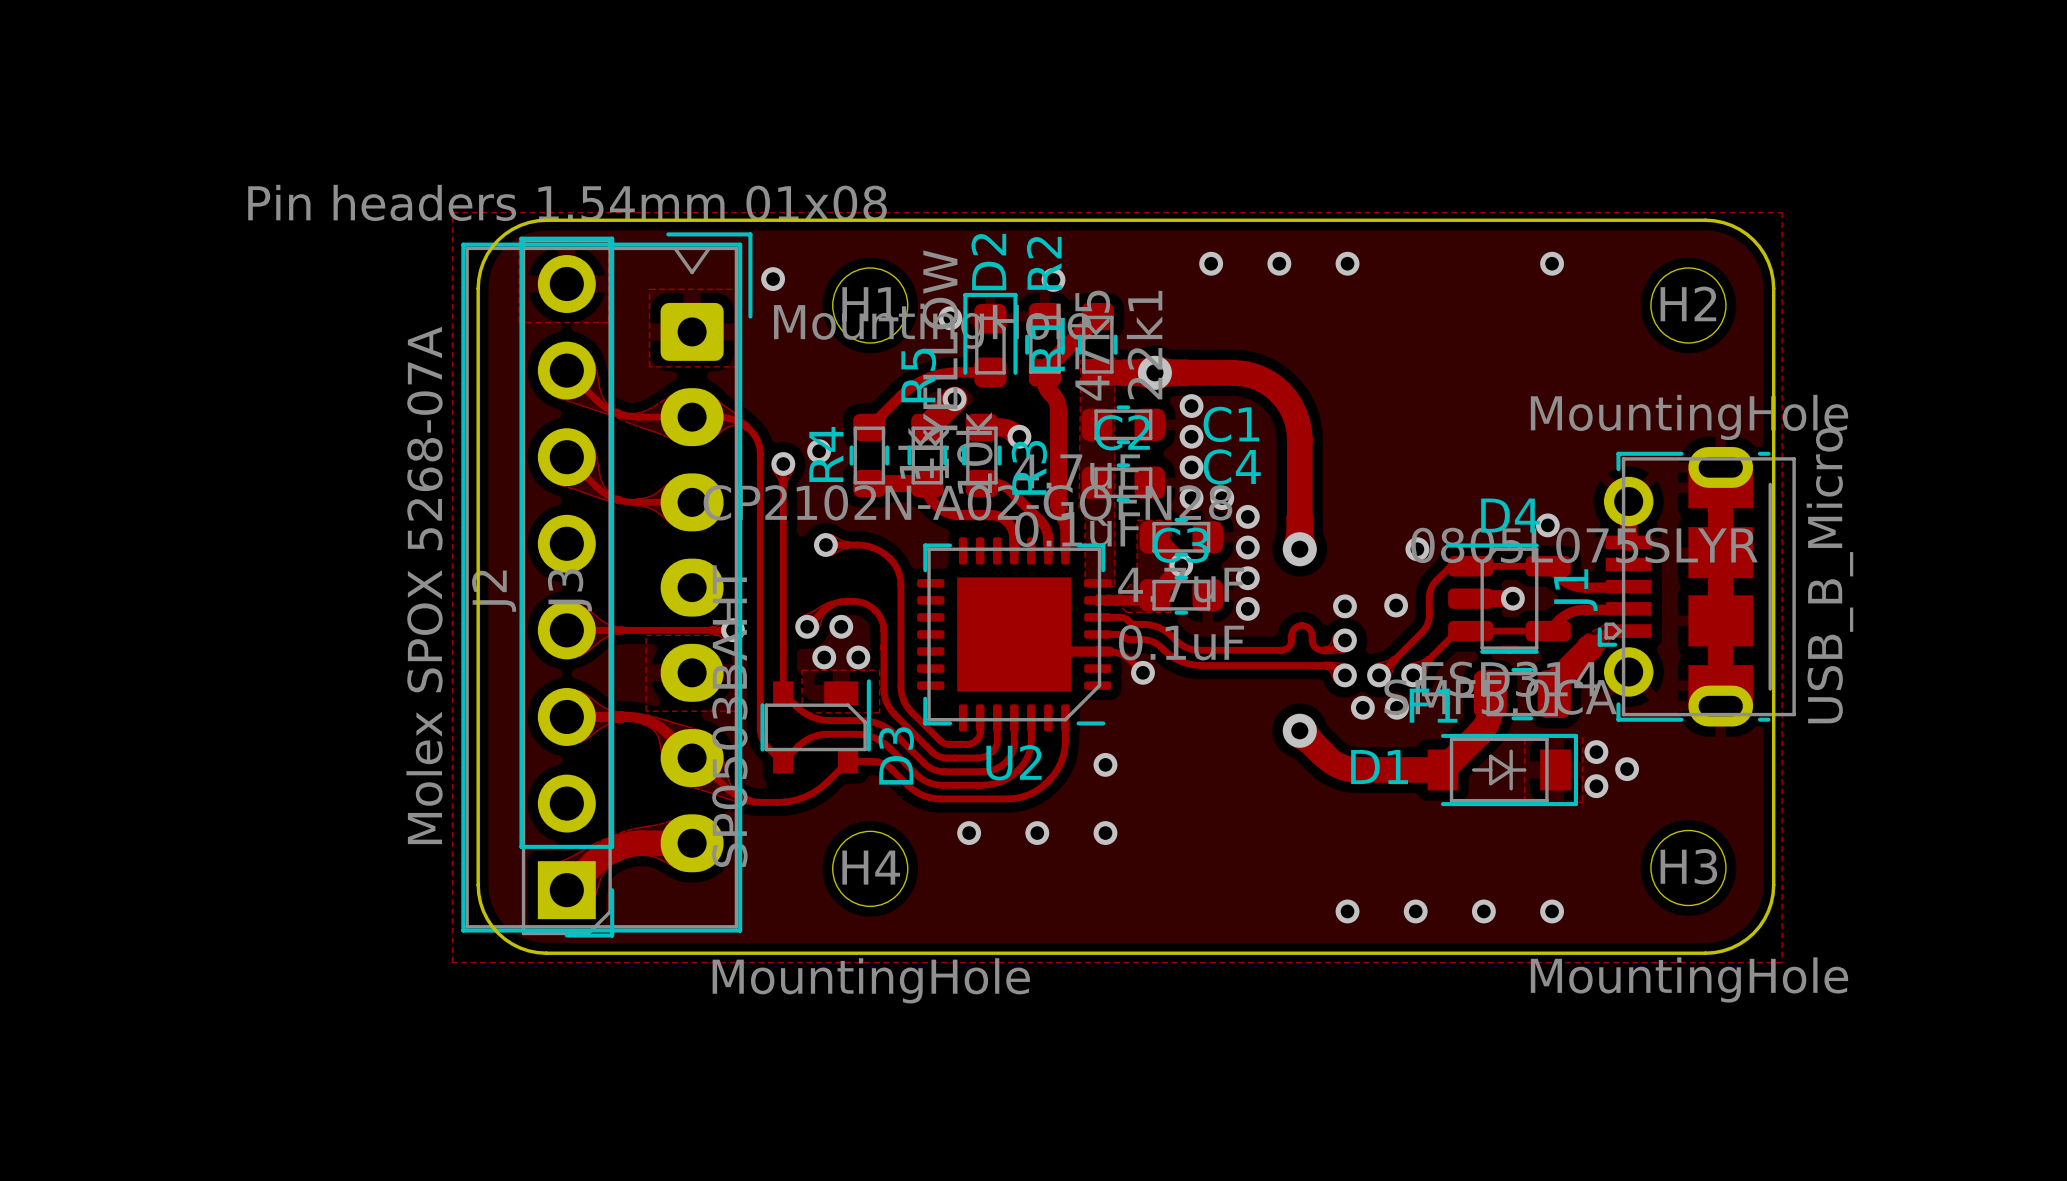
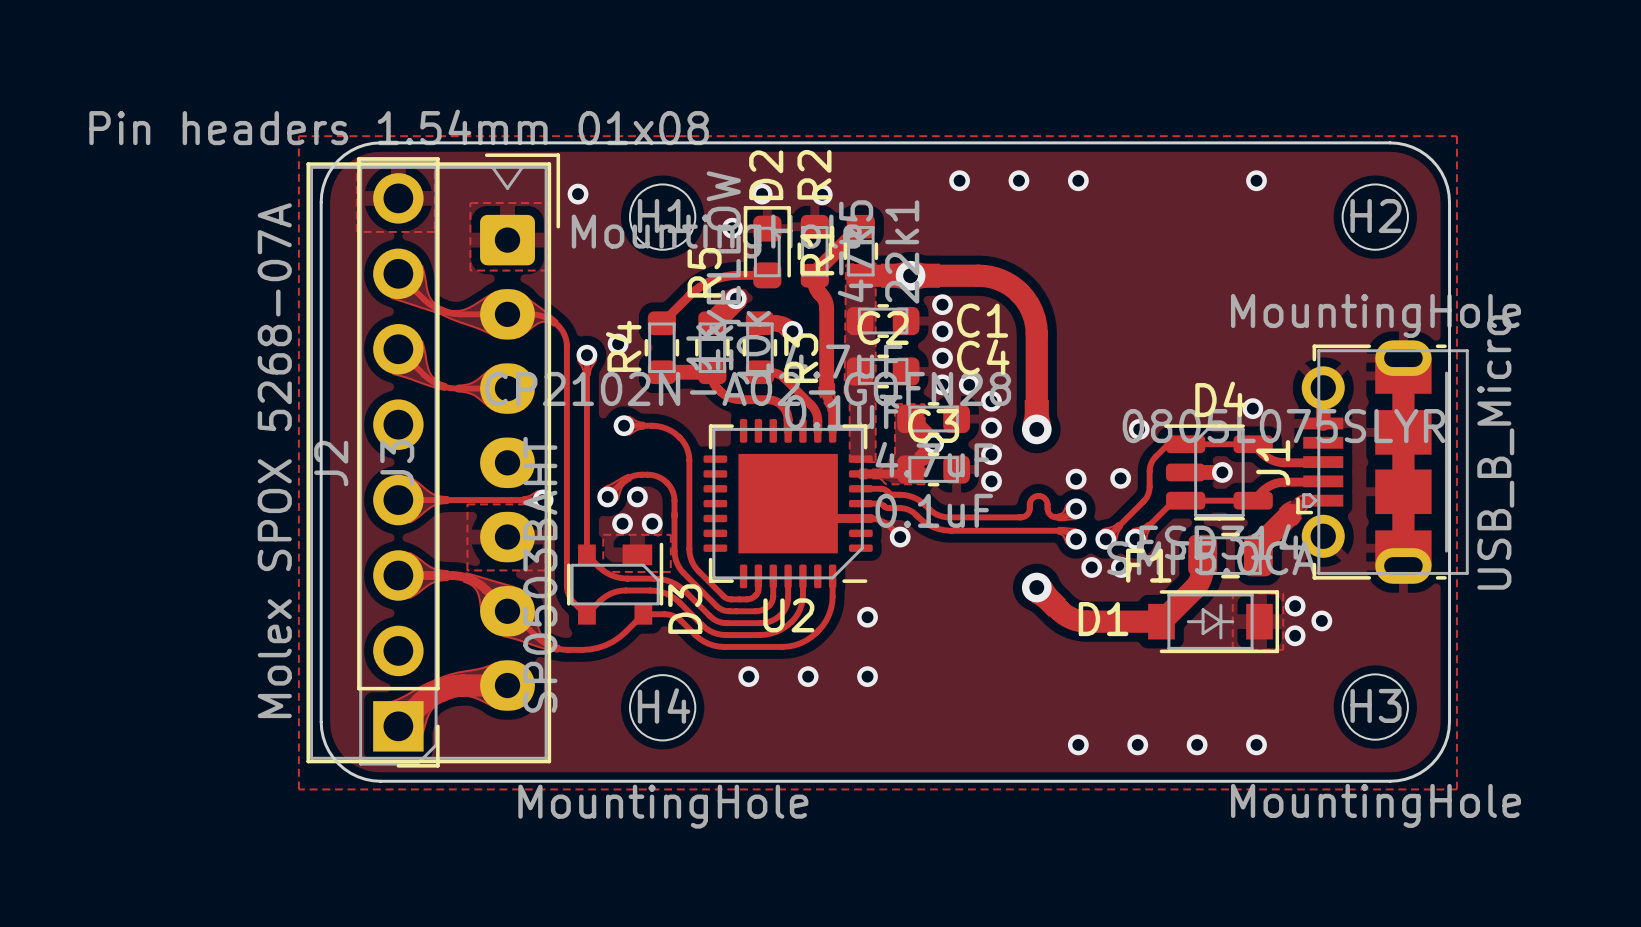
via: none -> (762, 194)

